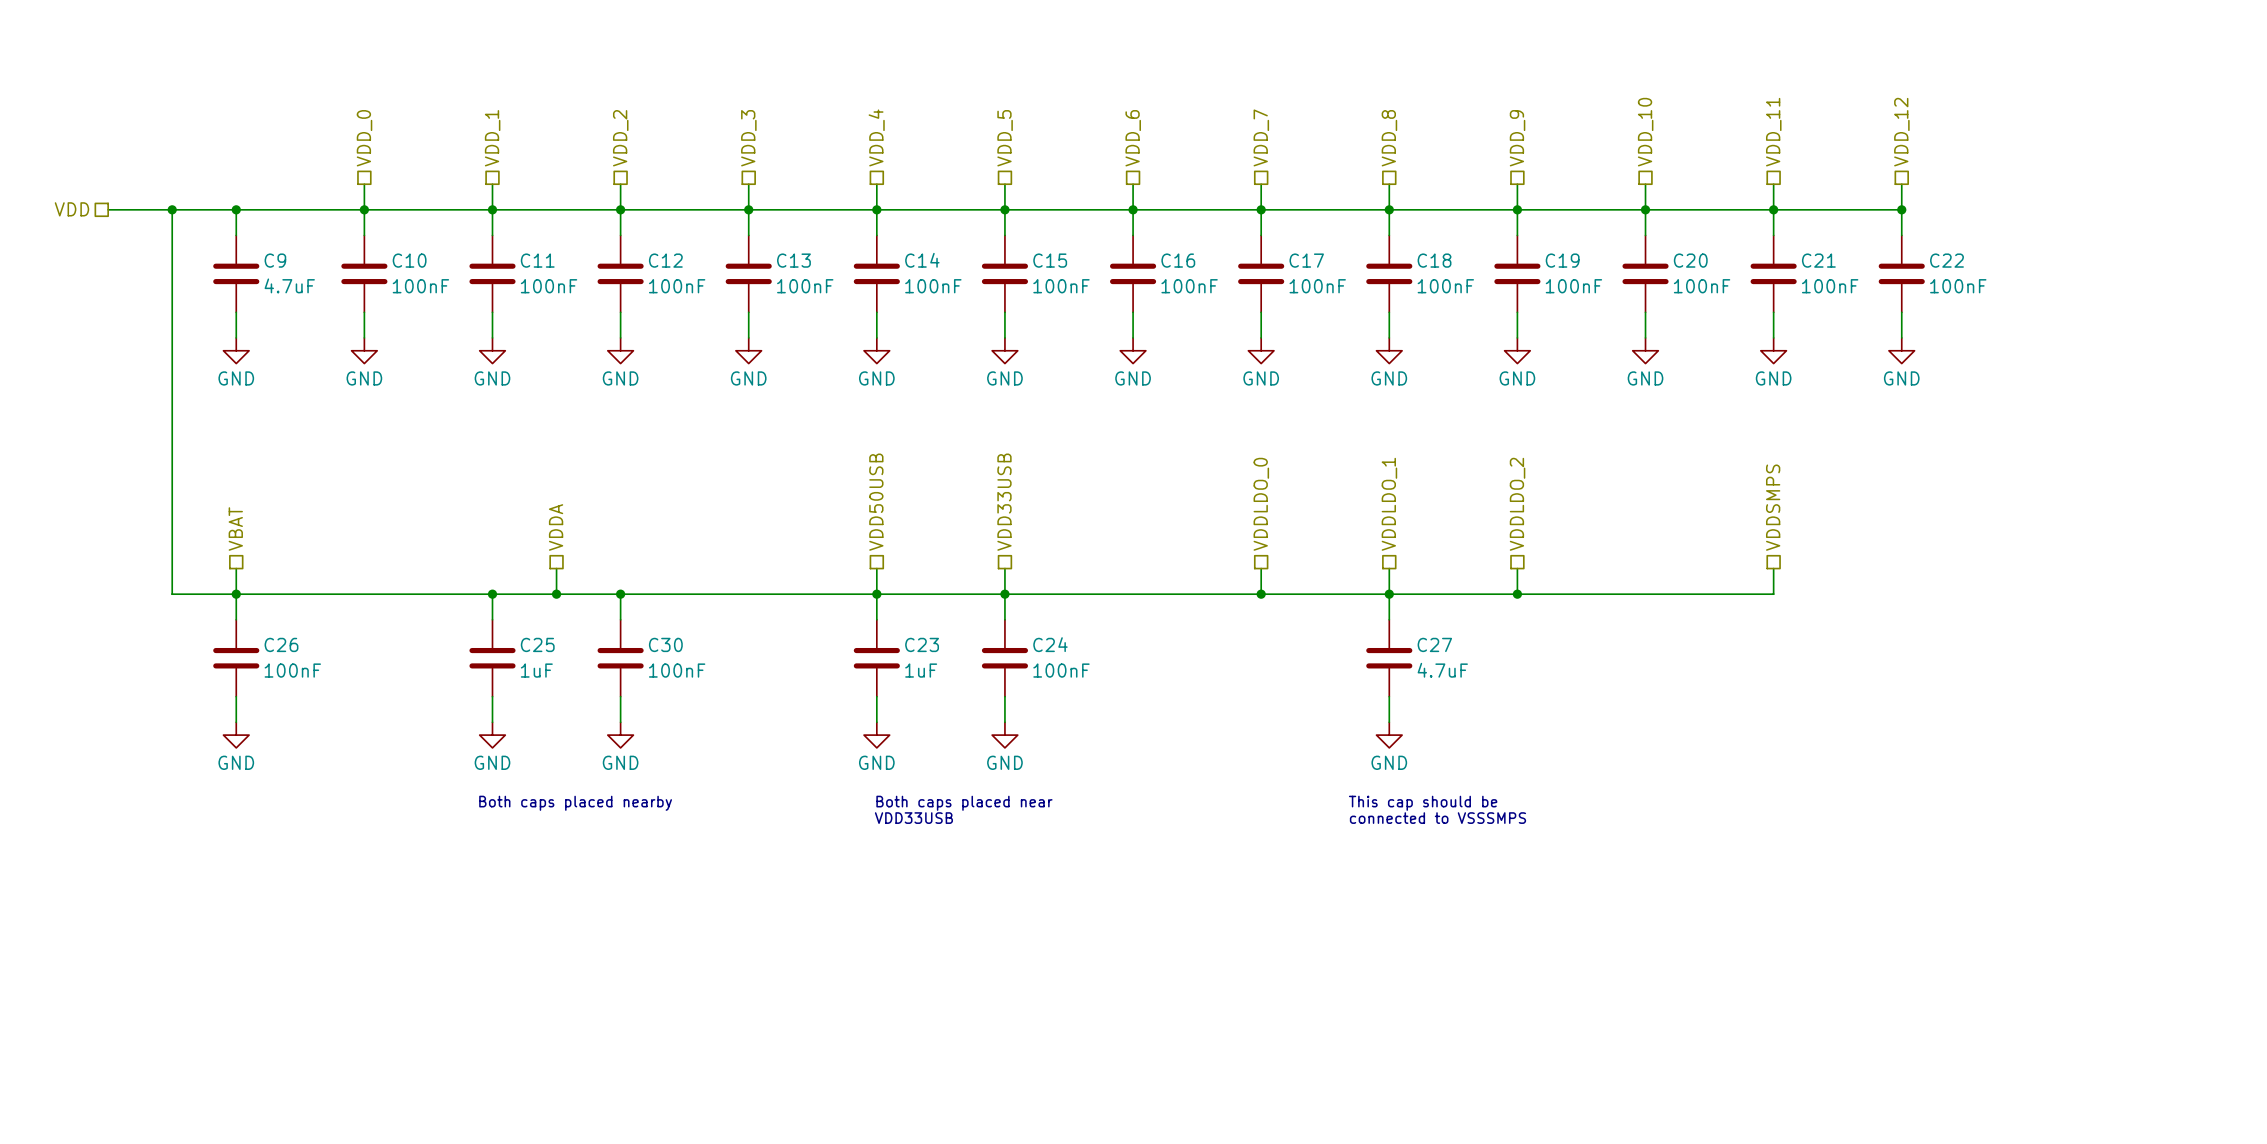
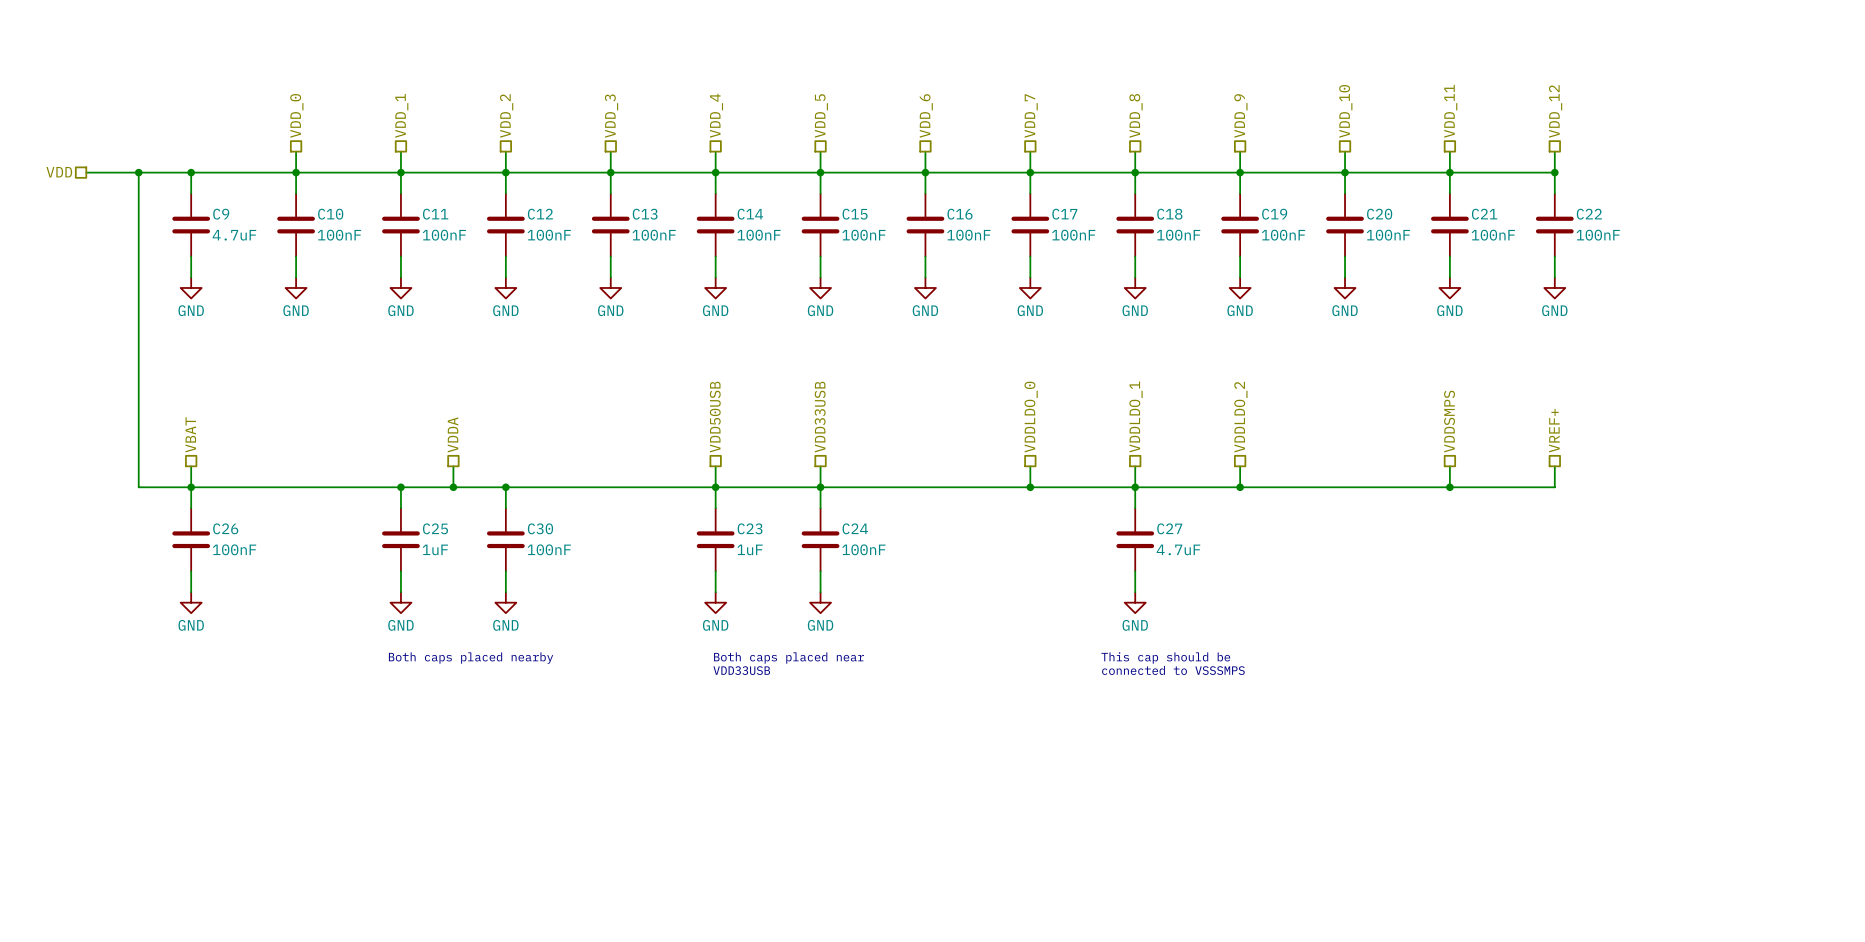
hierarchical label: none -> VREF+ (1554, 430)
wire: none -> (1554, 466) (1554, 487) (1449, 487)
junction: none -> (1449, 487)

